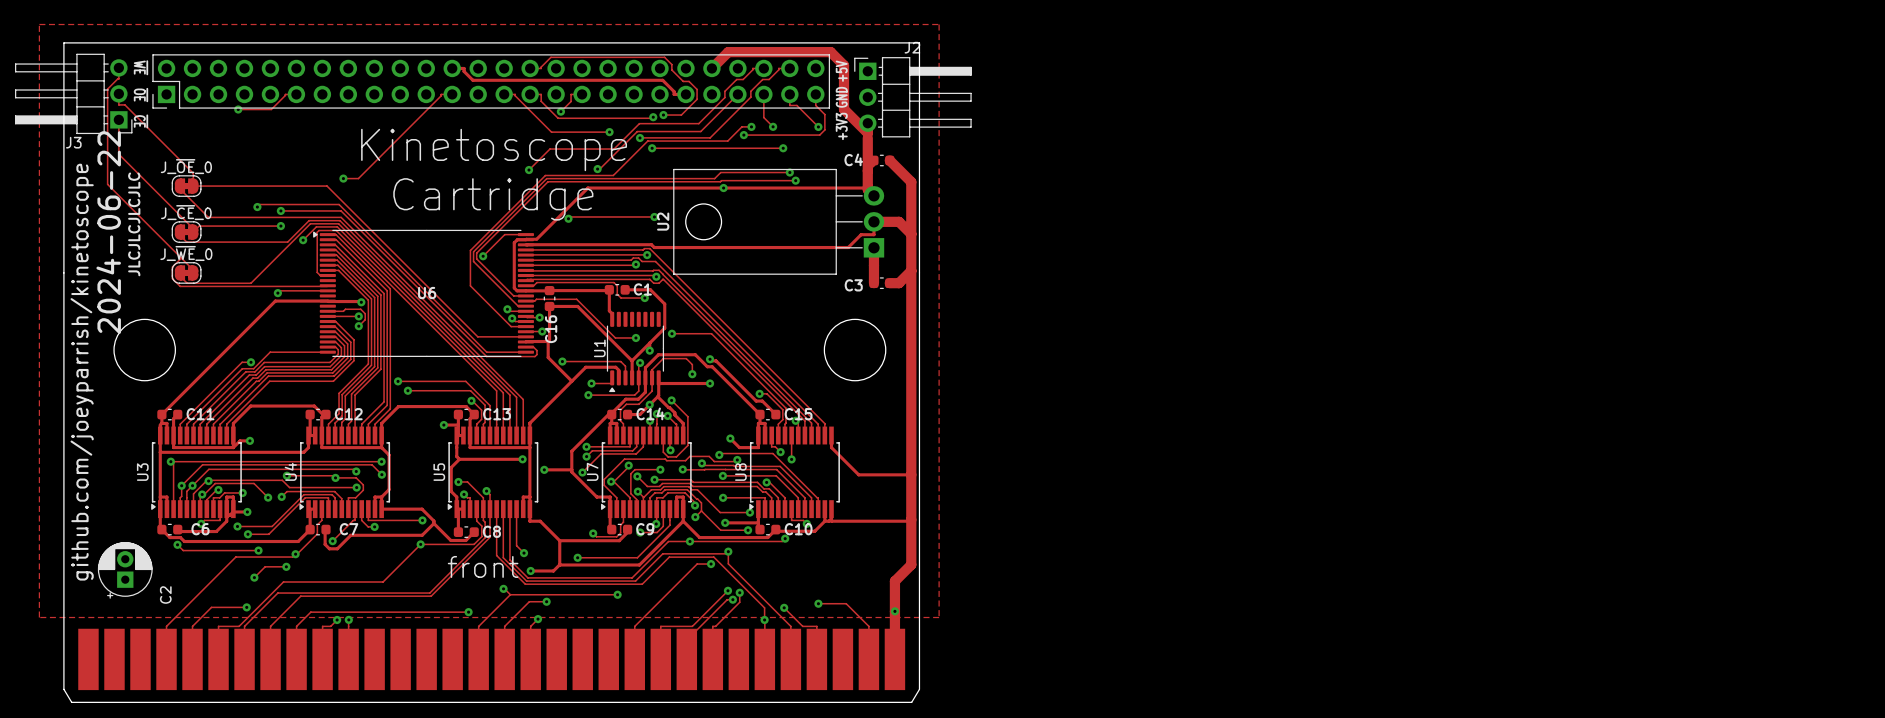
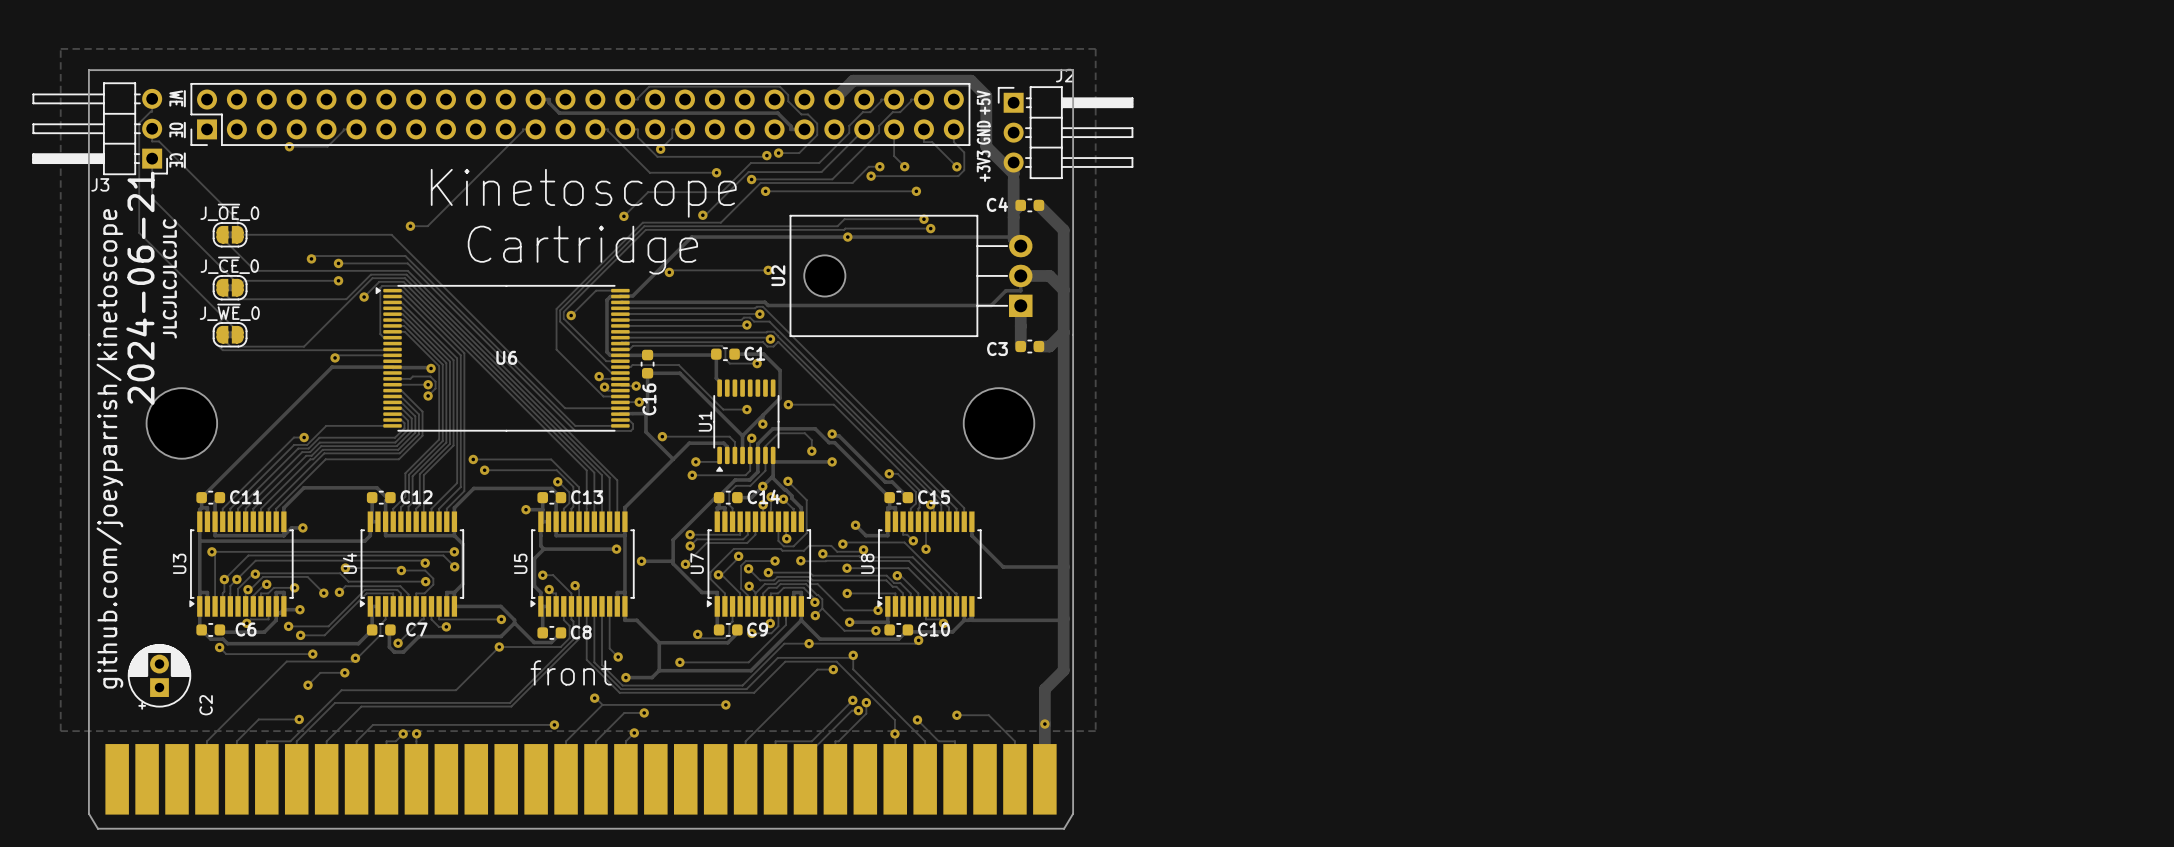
text: 2024-06-22 (108, 232) -> 2024-06-21 (140, 288)

